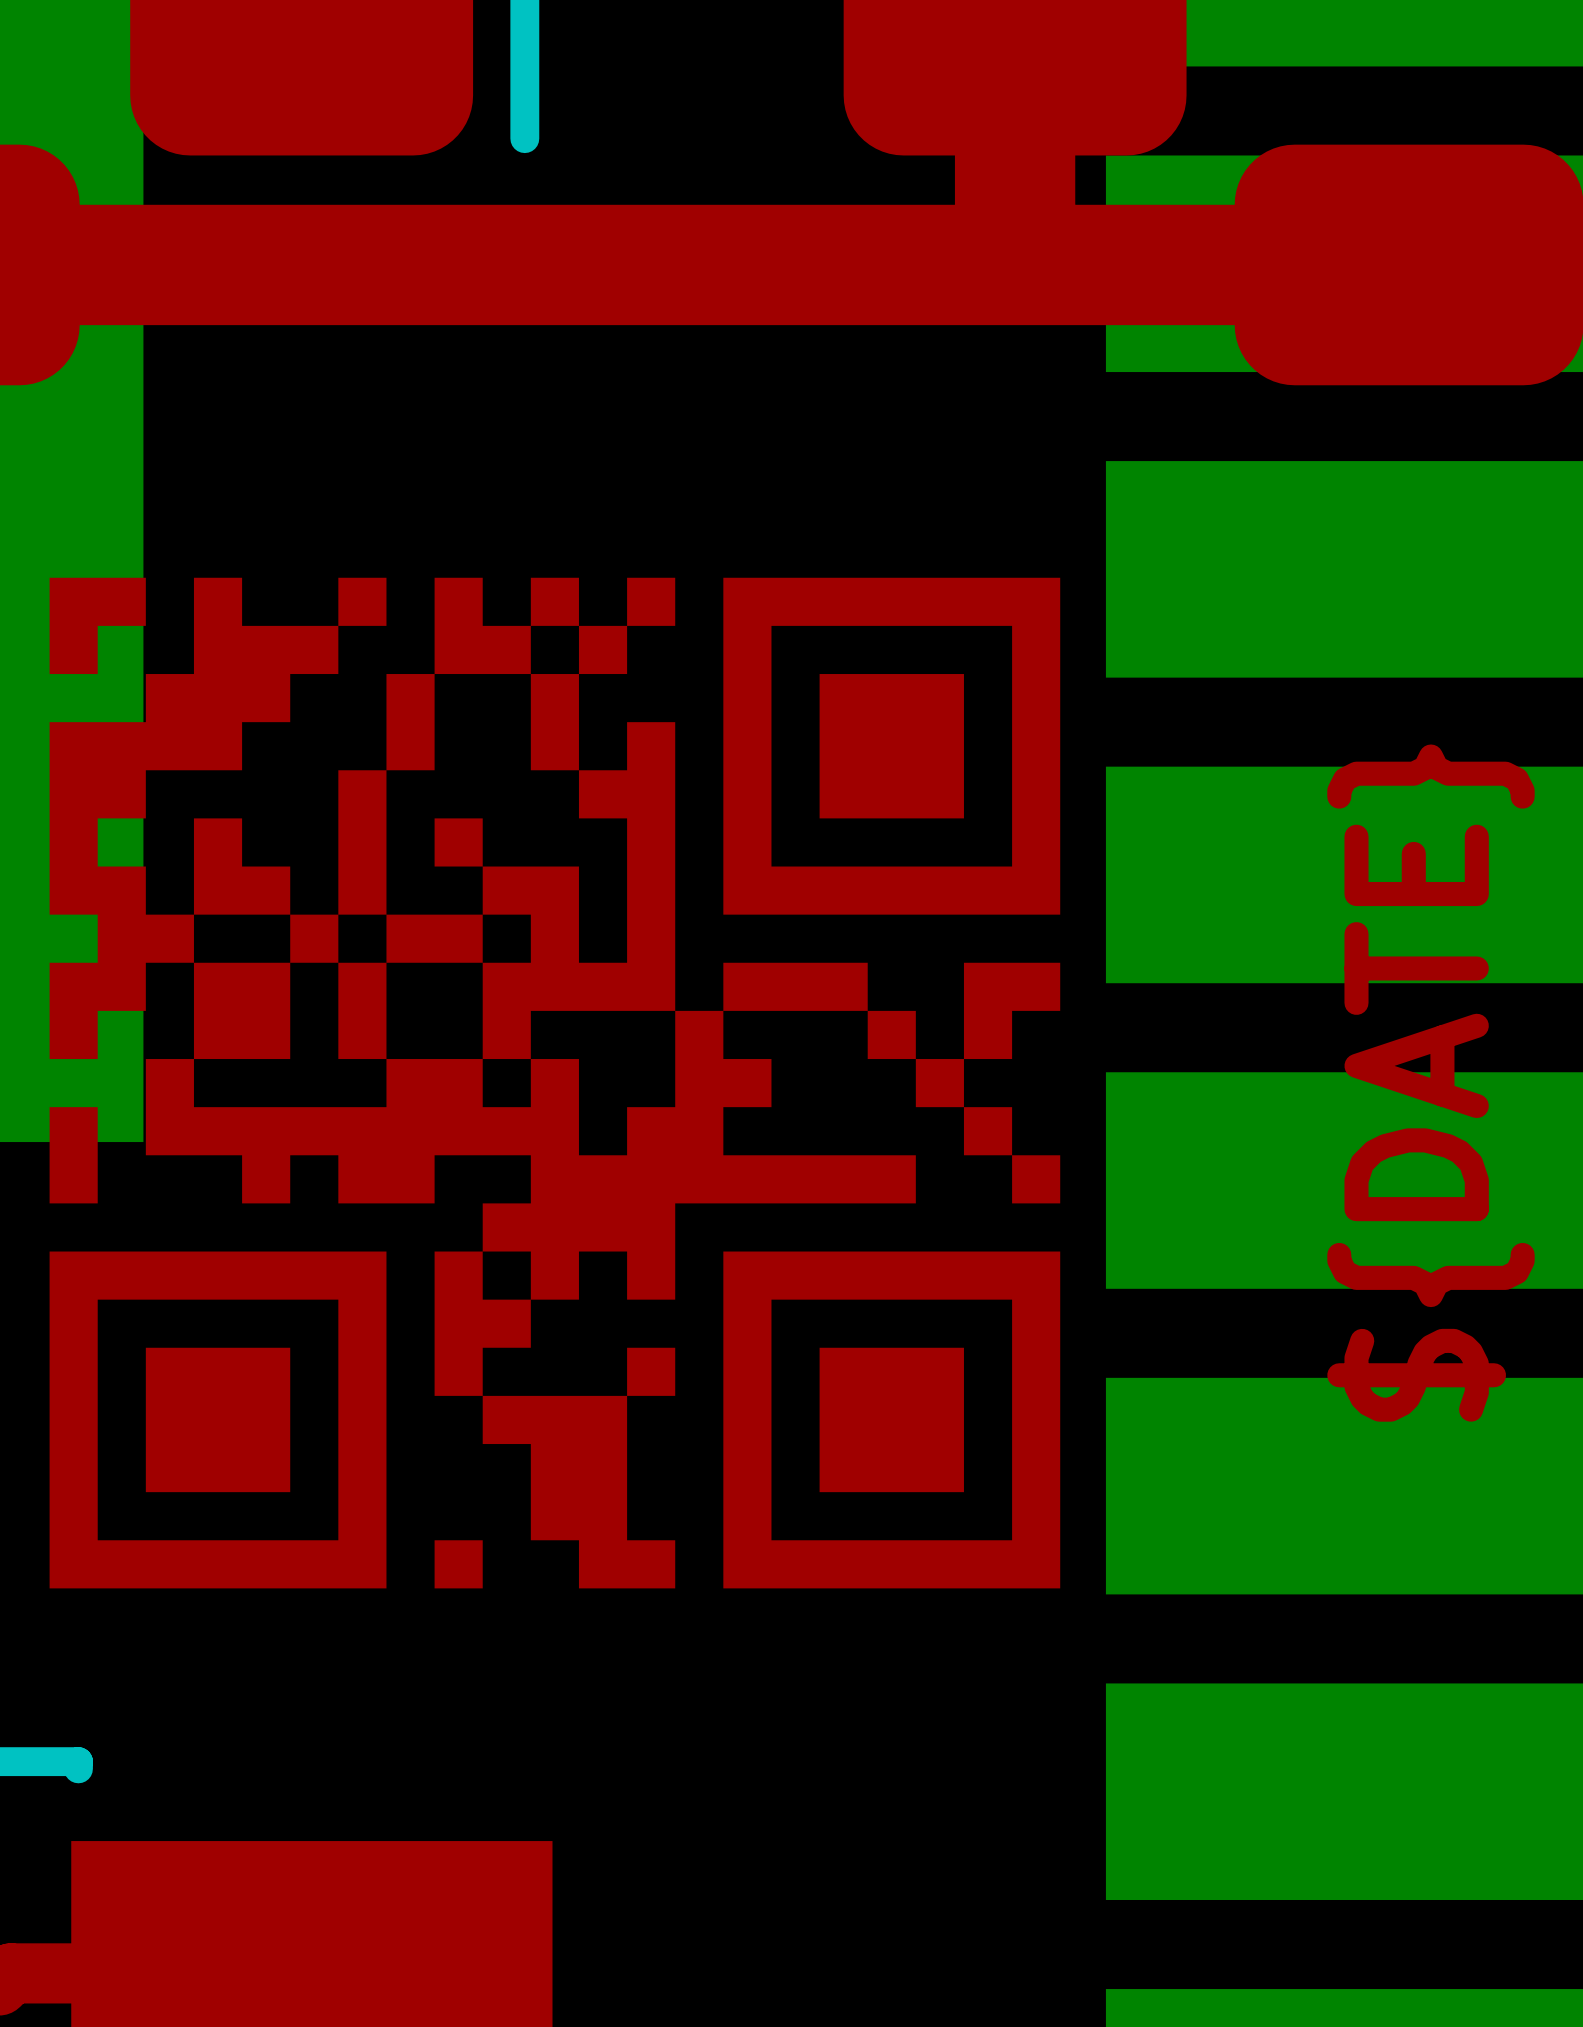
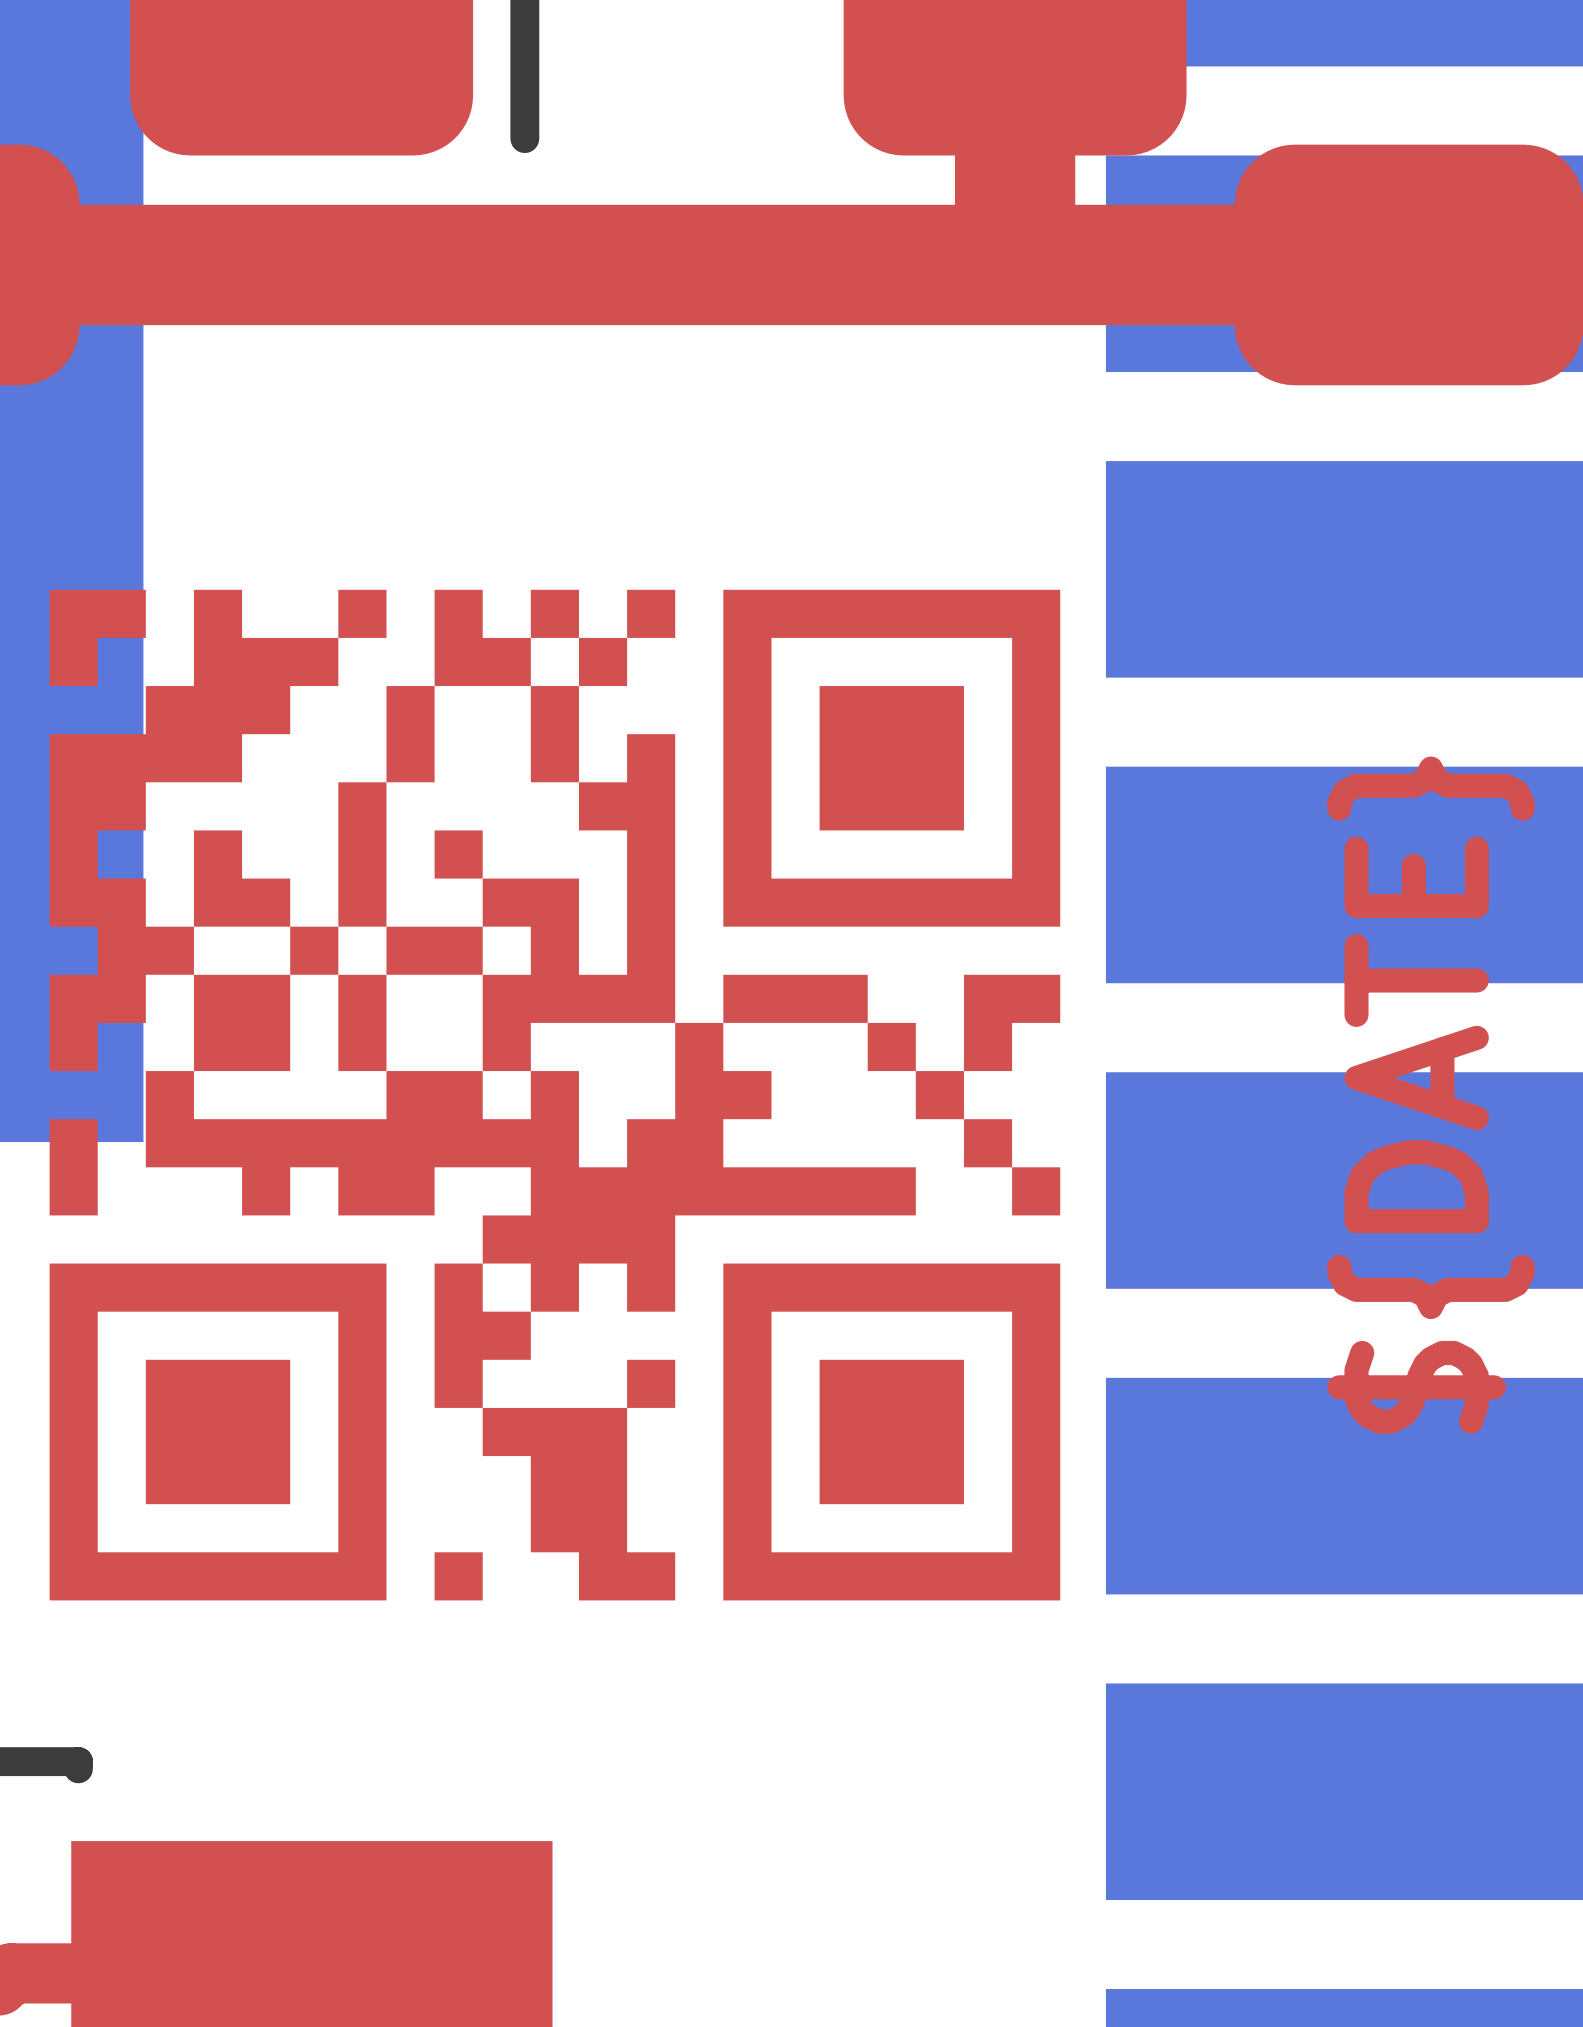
part position: (554, 1083) -> (554, 1095)

